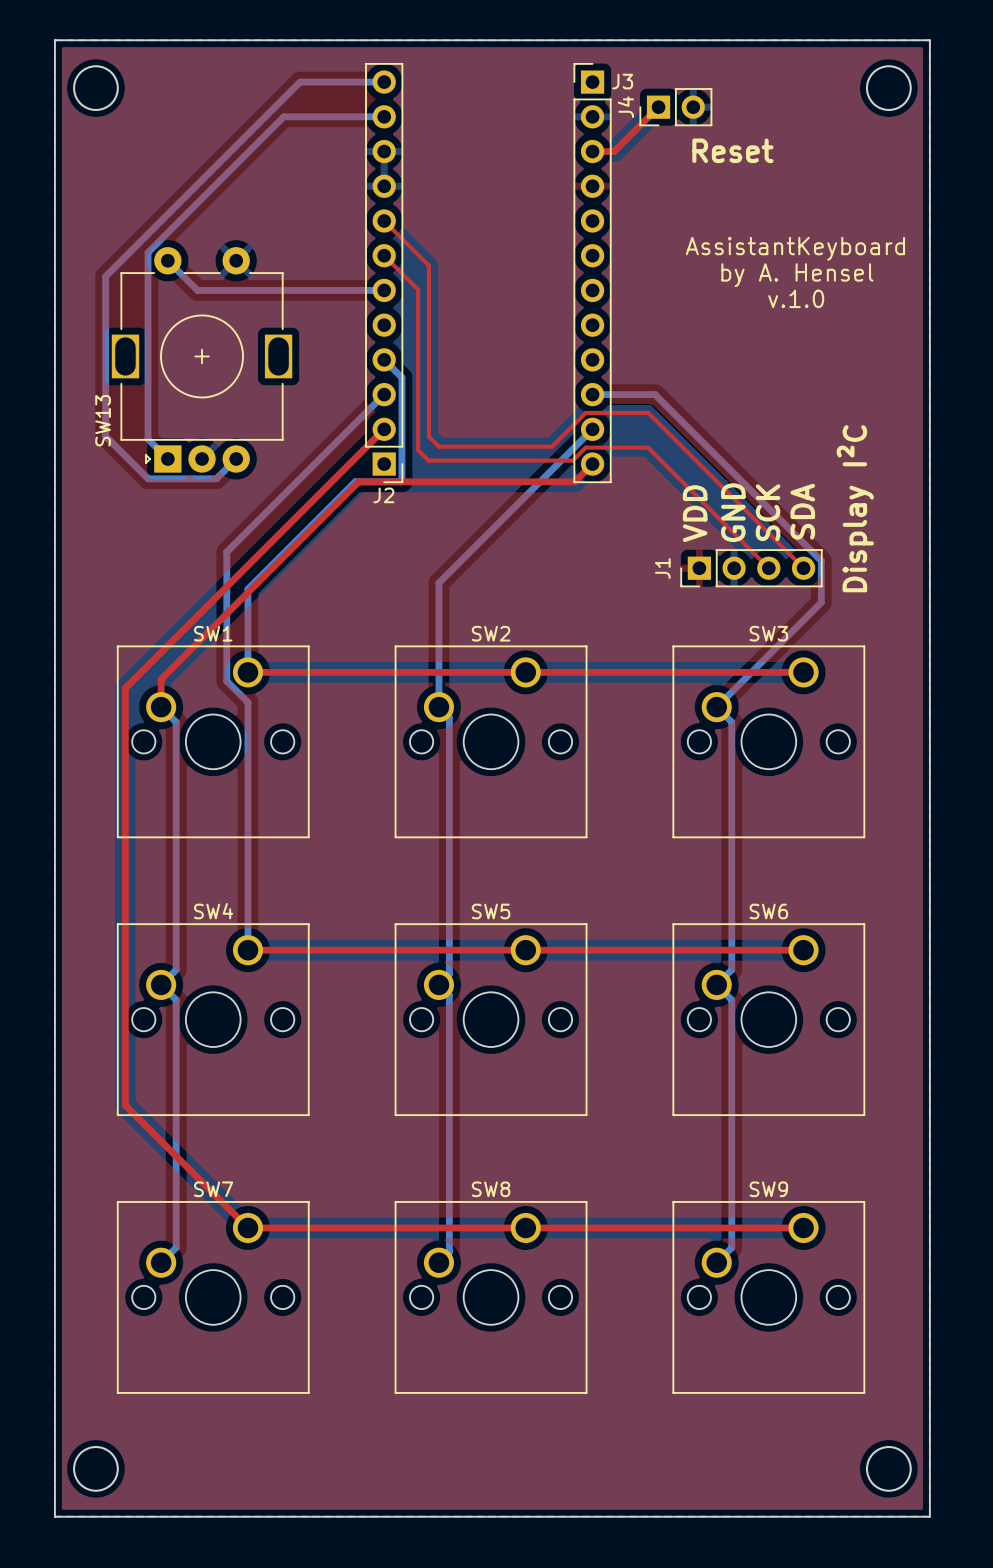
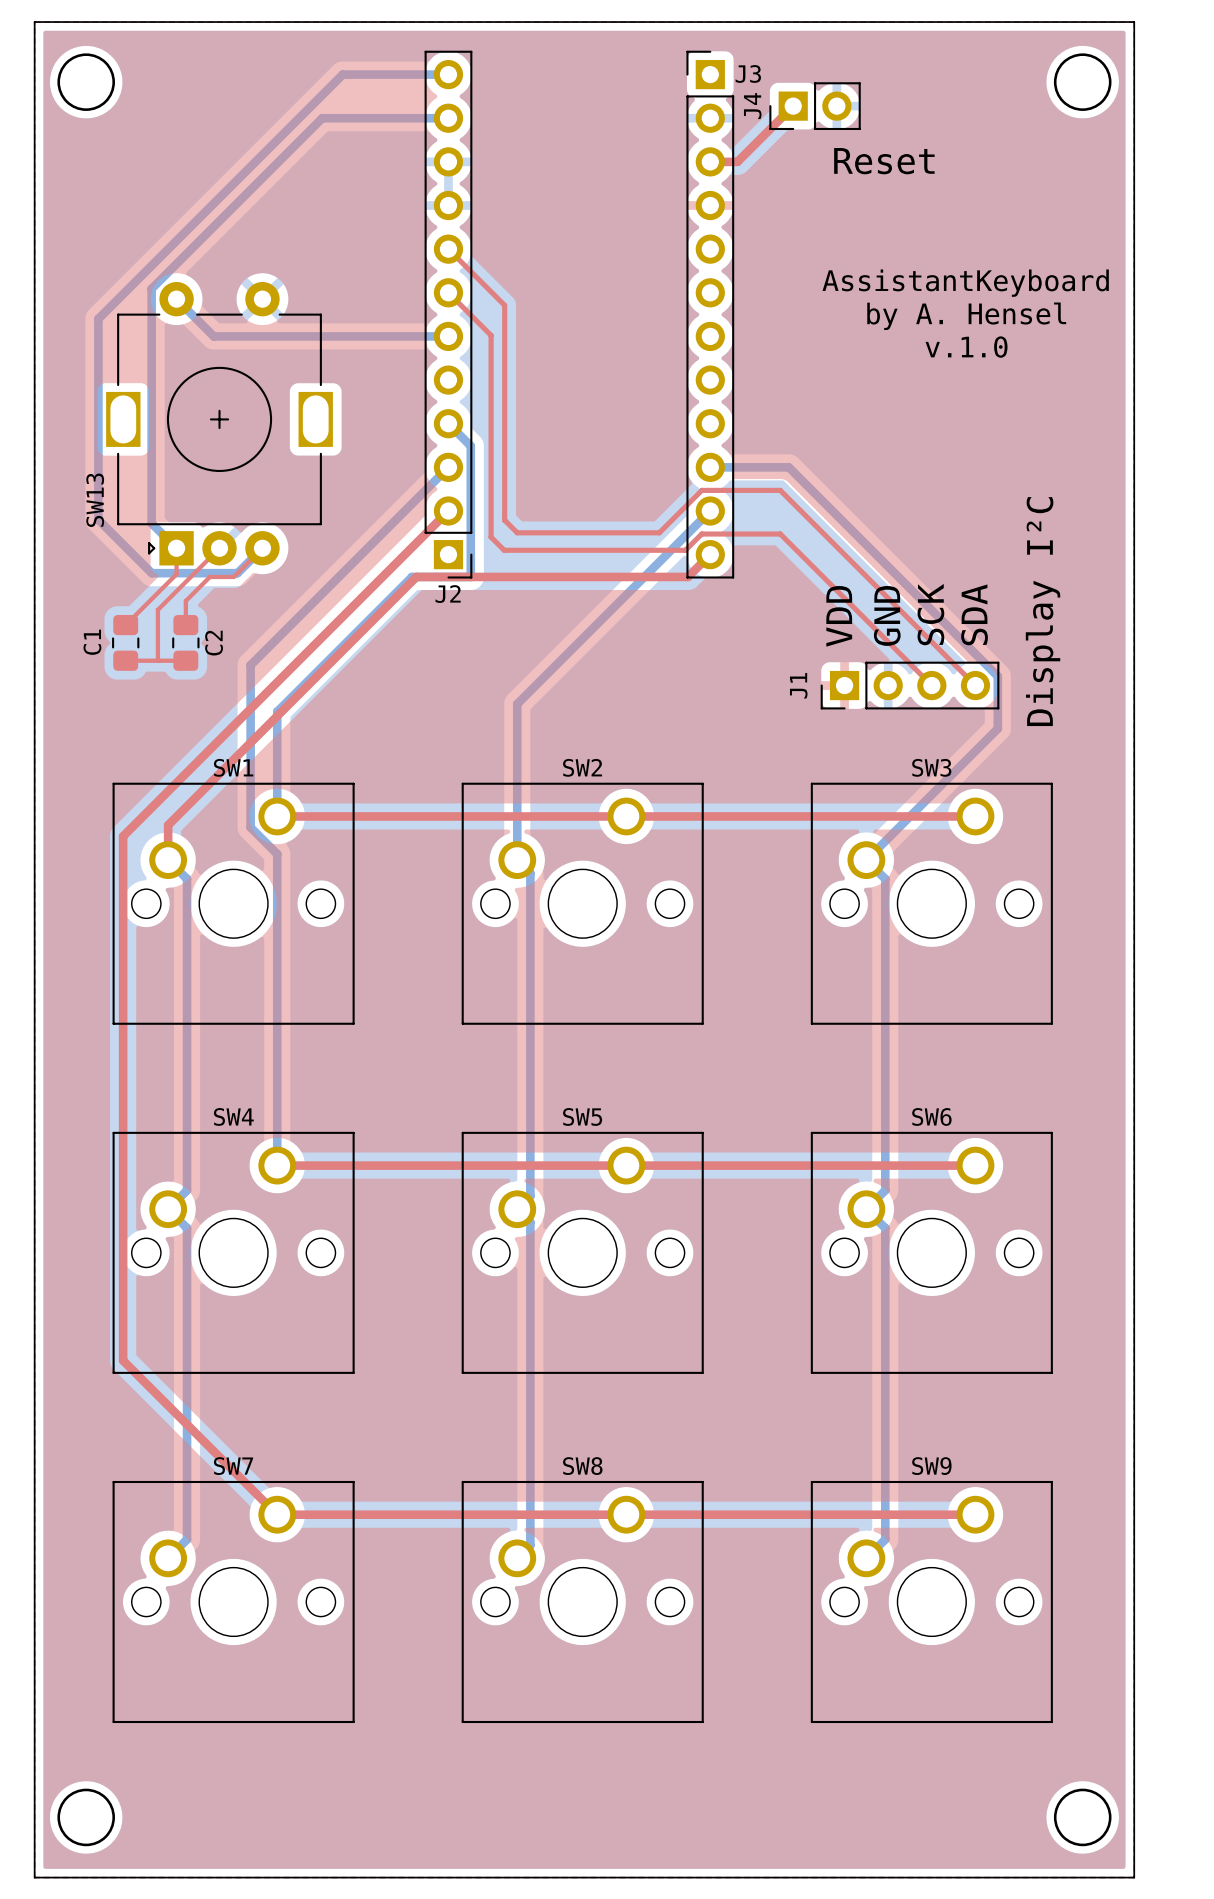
top track: none -> (176, 548) (176, 574) (125, 625)
top track: none -> (219, 548) (157, 609) (157, 660)
top track: none -> (262, 548) (233, 576) (209, 576) (185, 601) (185, 625)
C1: none -> (125, 642)
C2: none -> (185, 642)
top track: none -> (125, 660) (185, 660)

